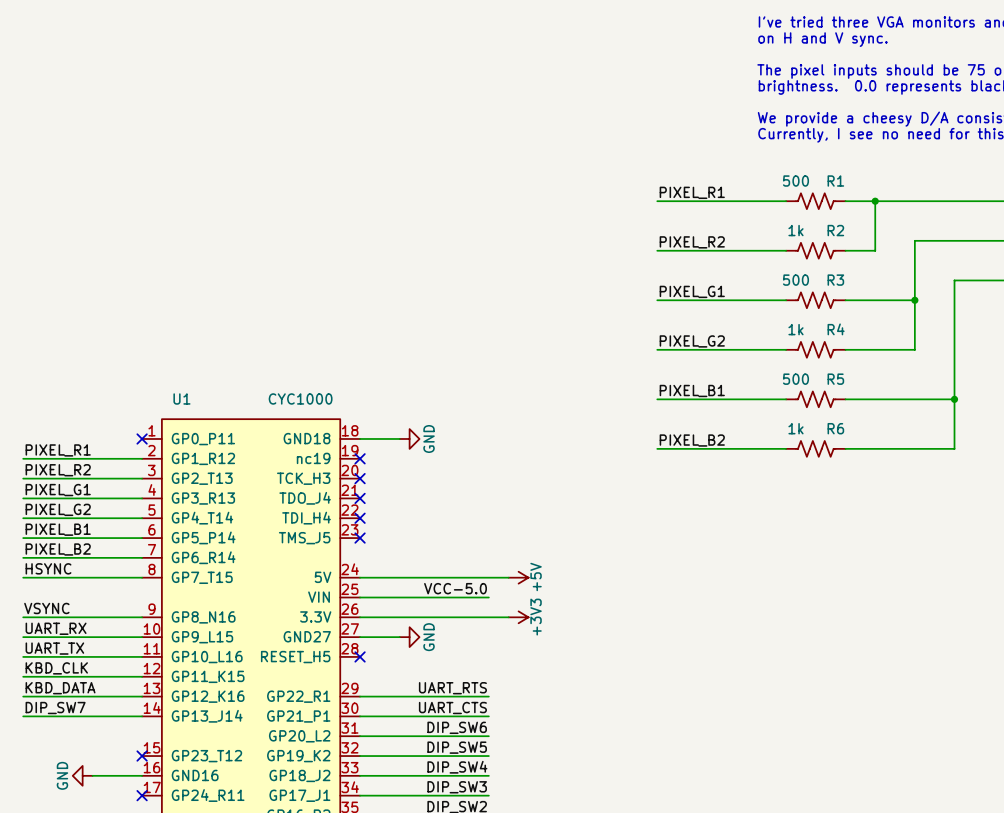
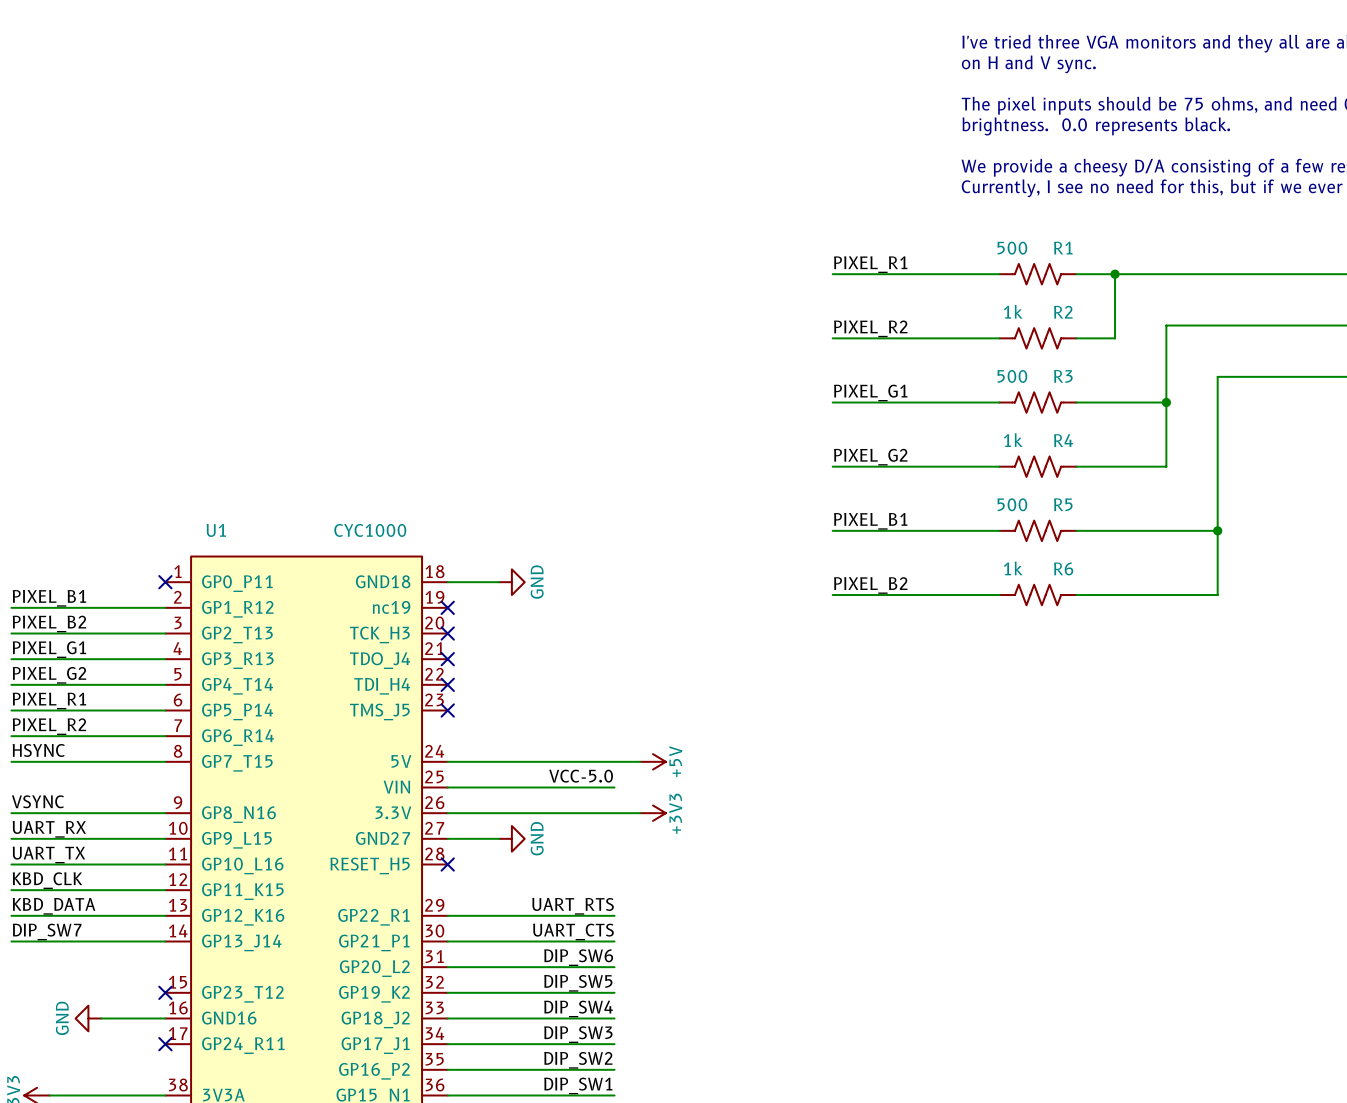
label: PIXEL_R1 (58, 450) -> PIXEL_B1 (49, 598)
label: PIXEL_R2 (58, 470) -> PIXEL_B2 (49, 623)
label: PIXEL_B1 (58, 529) -> PIXEL_R1 (49, 700)
label: PIXEL_B2 (58, 549) -> PIXEL_R2 (49, 726)

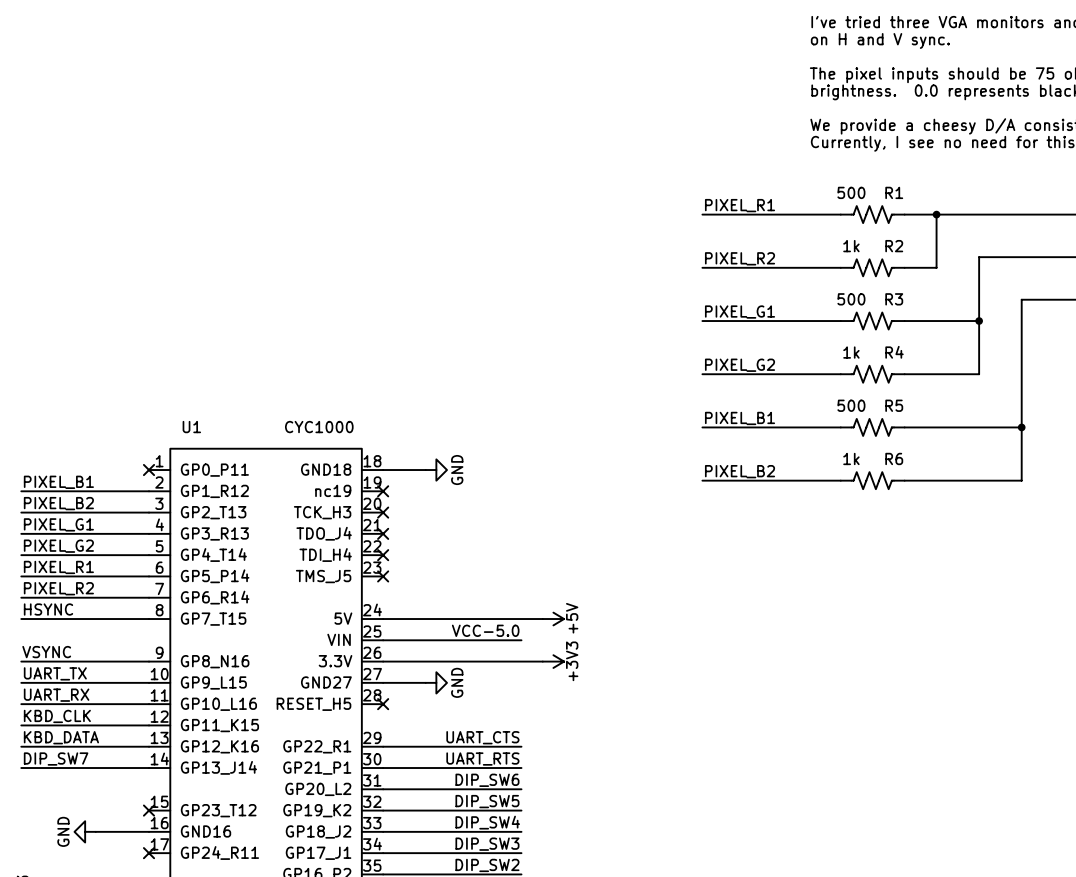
label: UART_RX (49, 829) -> UART_TX (55, 673)
label: UART_TX (48, 854) -> UART_RX (56, 695)
label: UART_RTS (573, 906) -> UART_CTS (482, 737)
label: UART_CTS (573, 931) -> UART_RTS (482, 759)

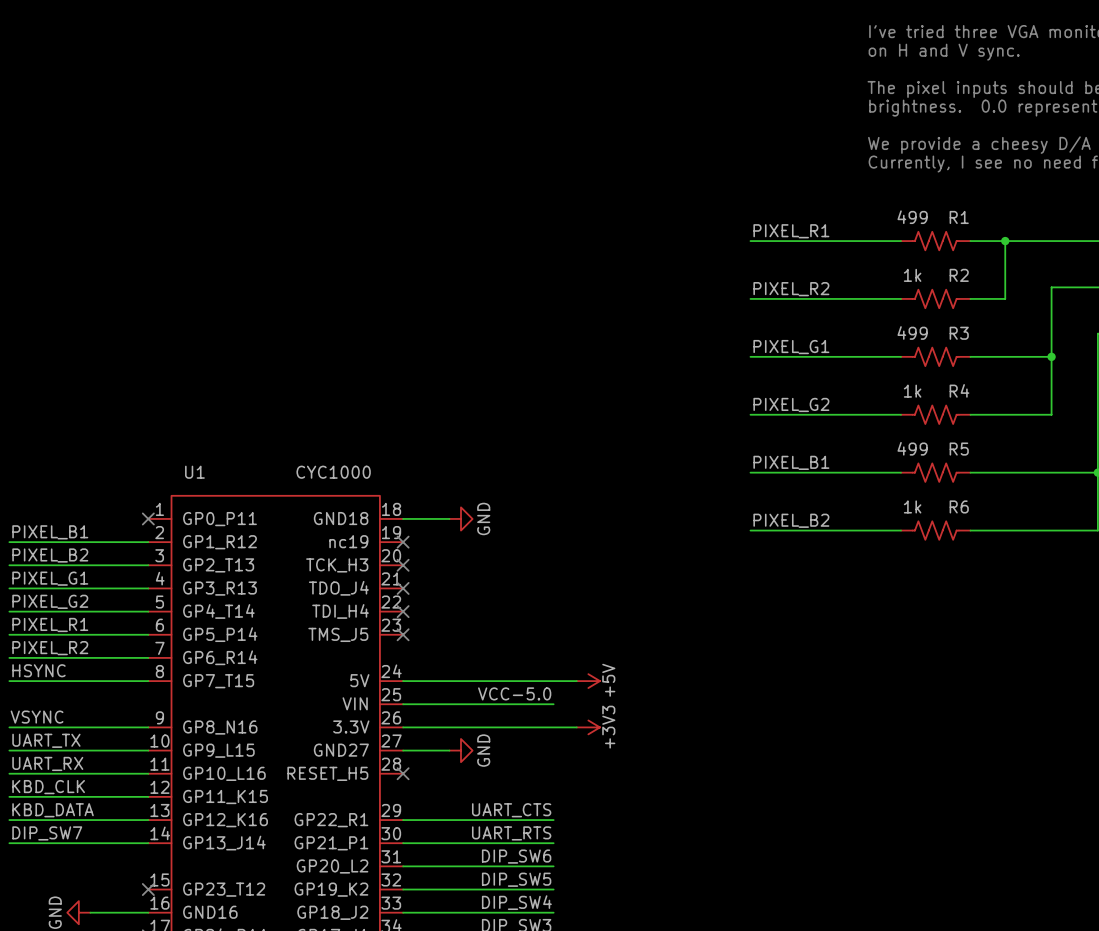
R1 value: 500 (851, 192) -> 499 (912, 217)
R3 value: 500 (851, 299) -> 499 (912, 332)
R5 value: 500 (851, 405) -> 499 (912, 448)

